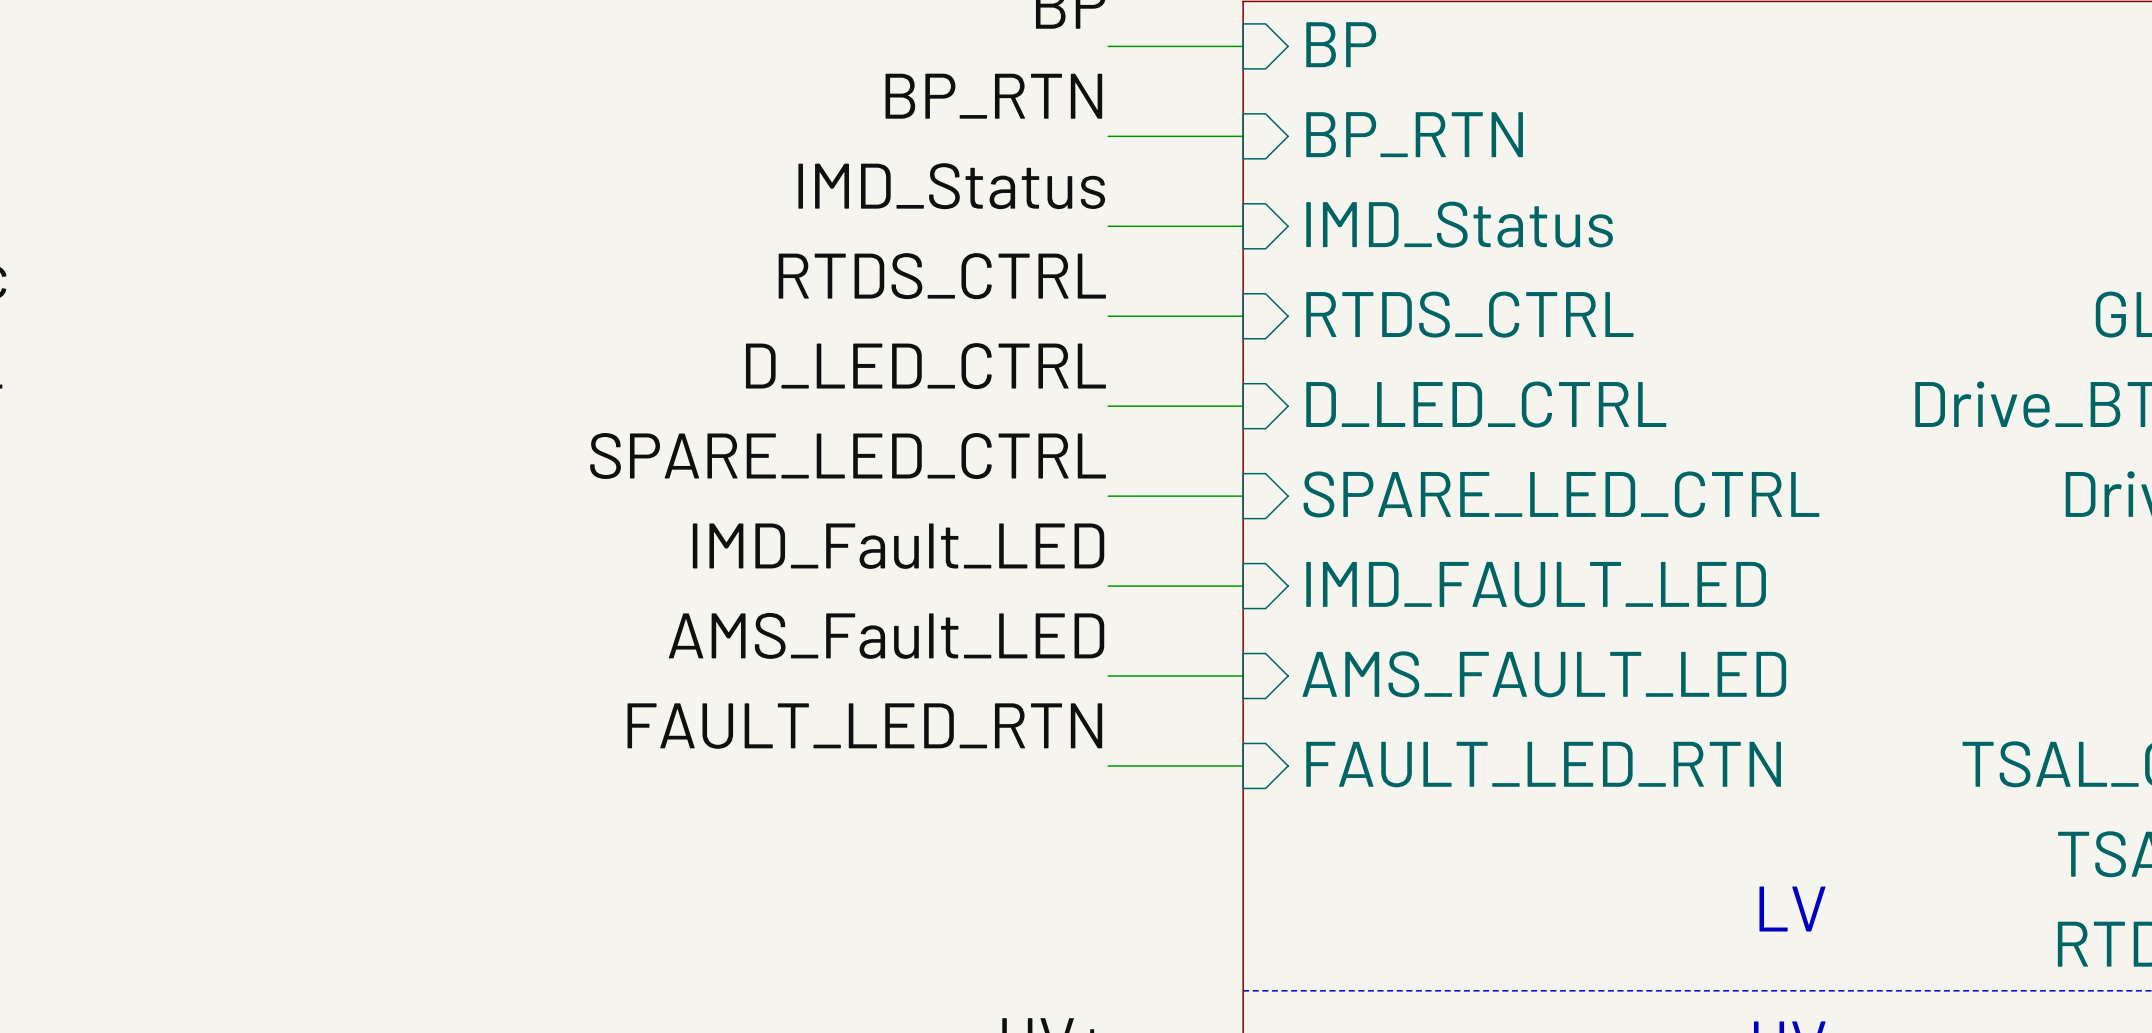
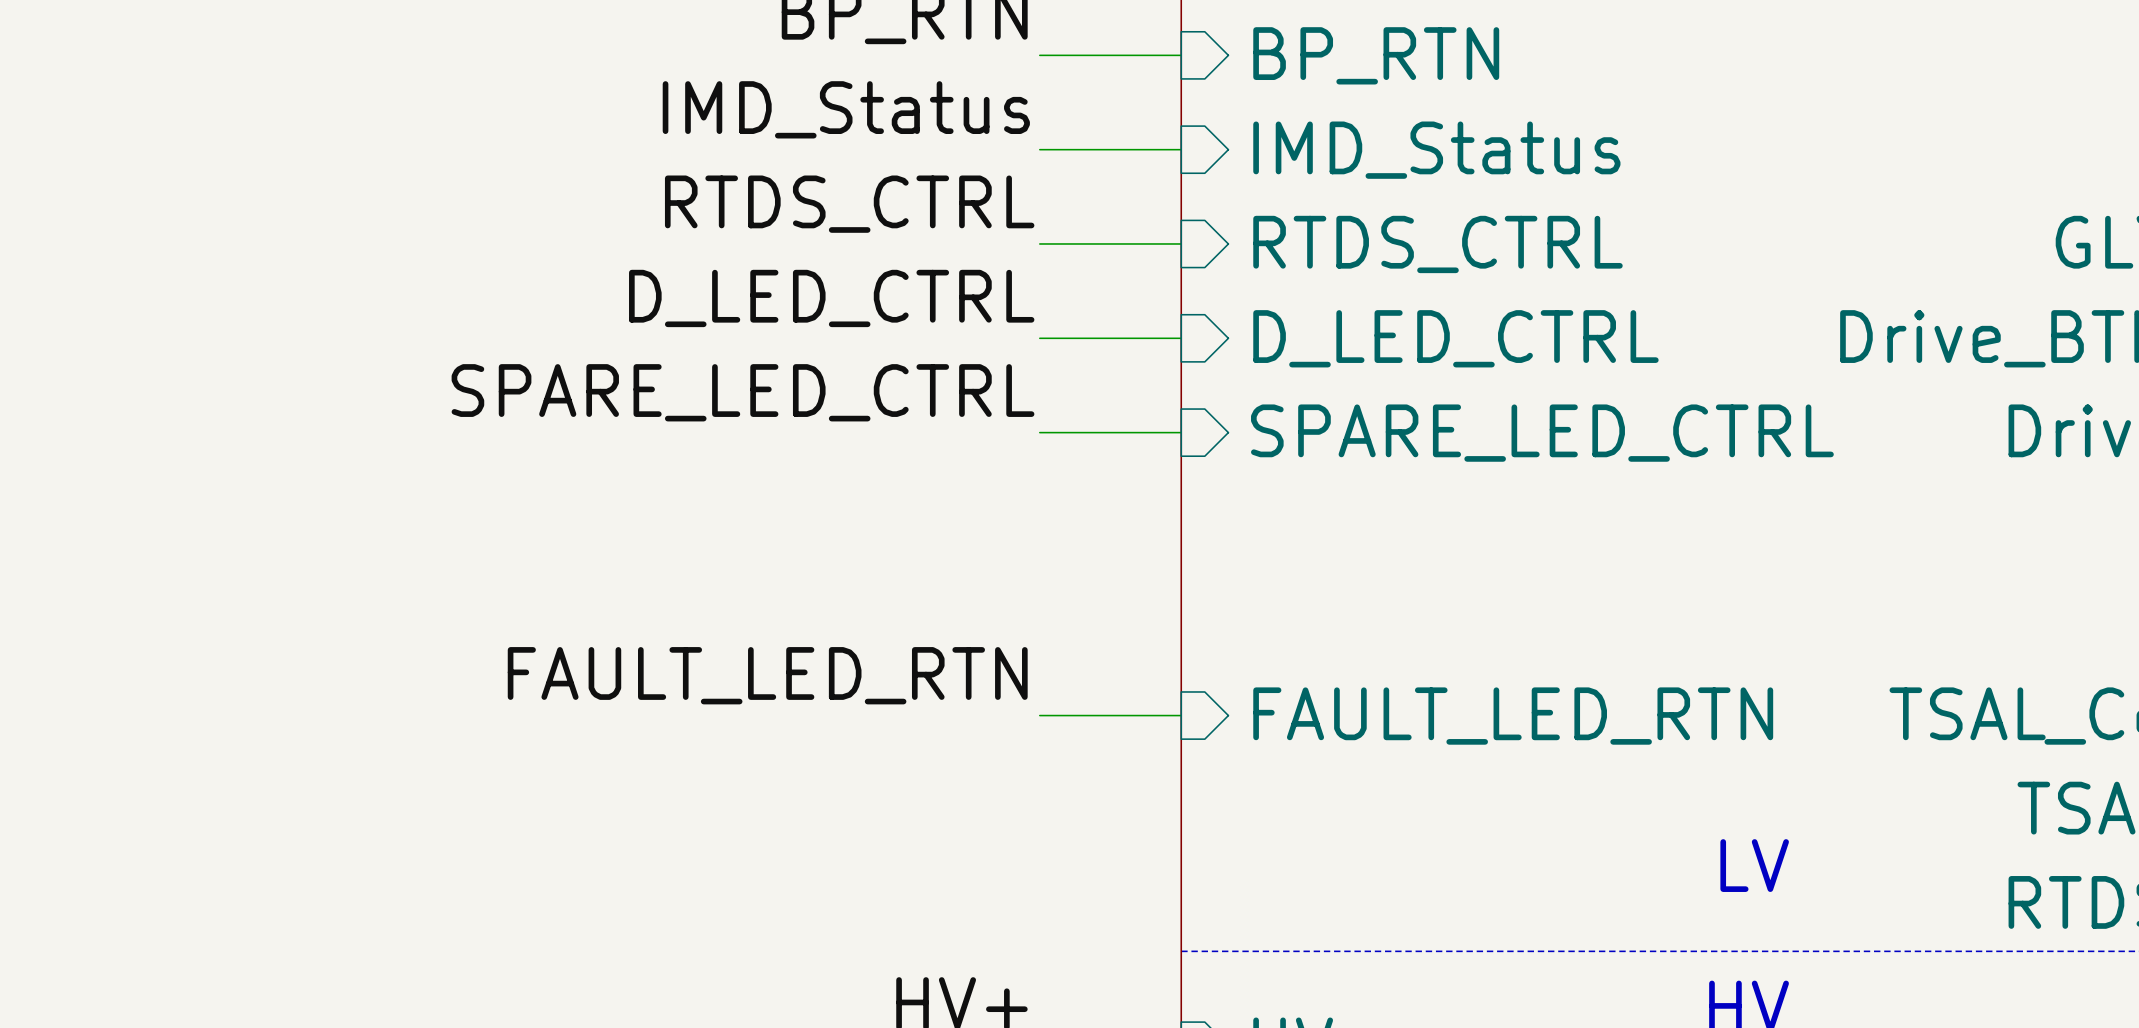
label: IMD_Fault_LED (898, 546) -> none
sheet pin: IMD_FAULT_LED (1536, 584) -> none
wire: (1108, 586) (1243, 586) -> none
label: AMS_Fault_LED (886, 635) -> none
sheet pin: AMS_FAULT_LED (1544, 674) -> none
wire: (1108, 676) (1243, 676) -> none

